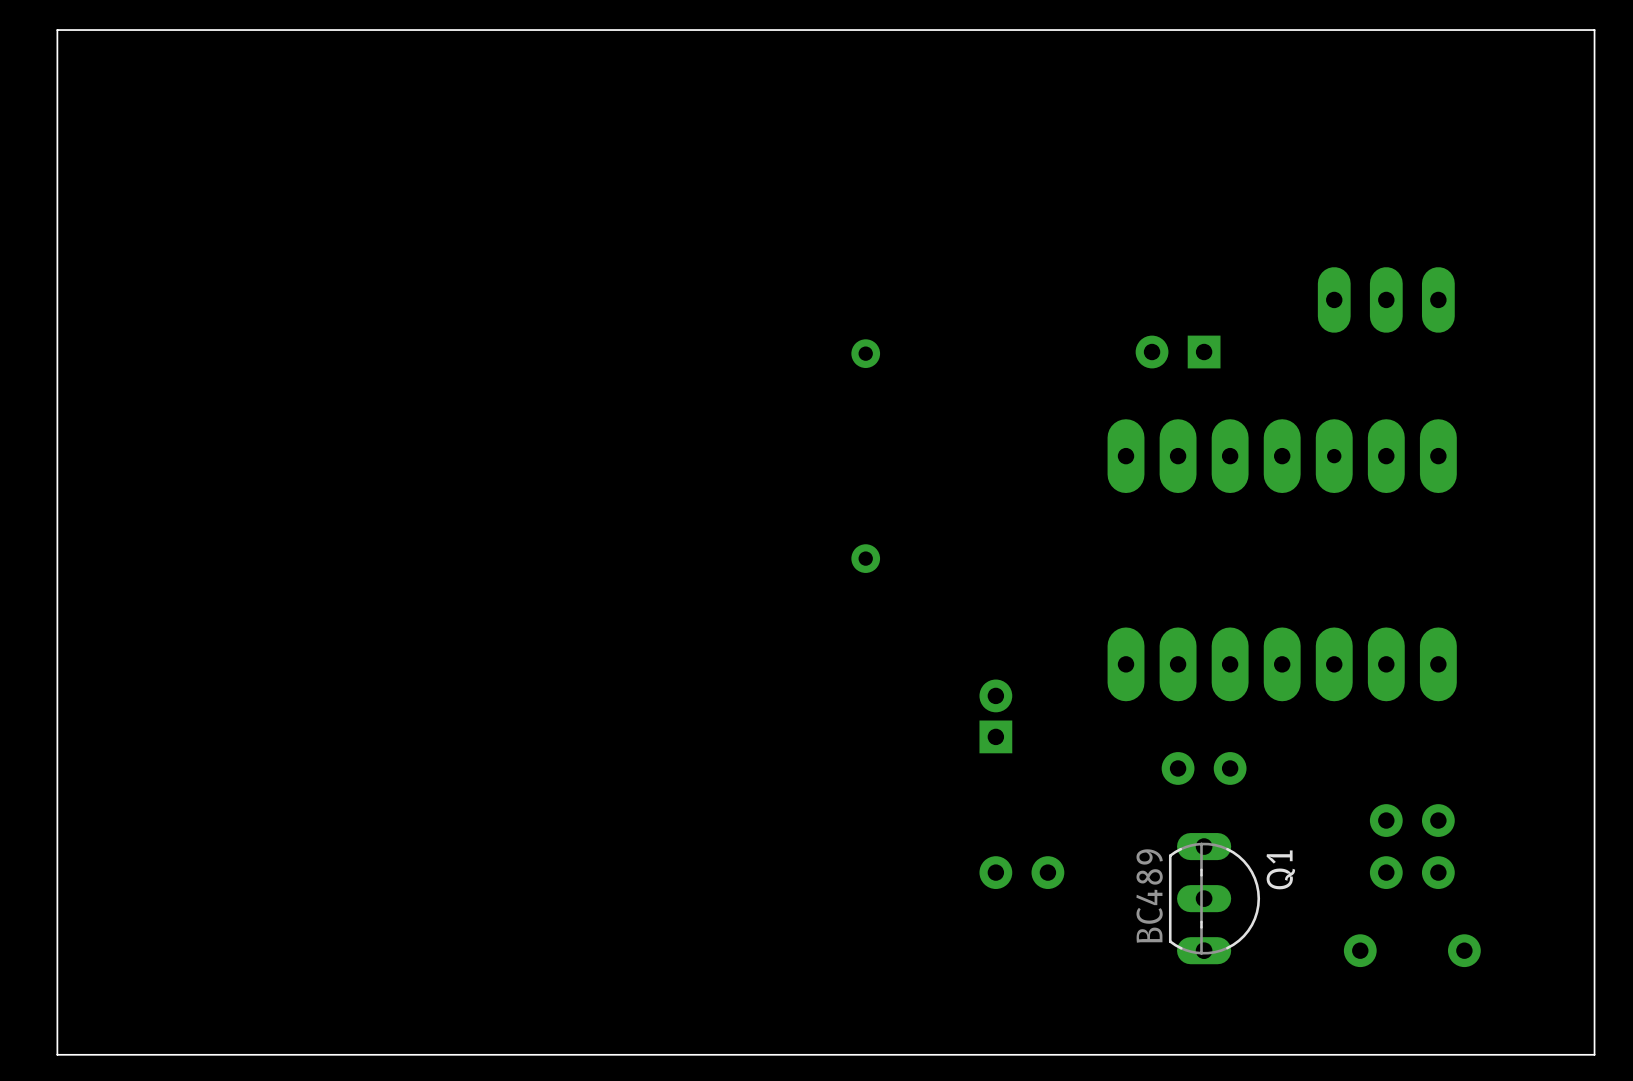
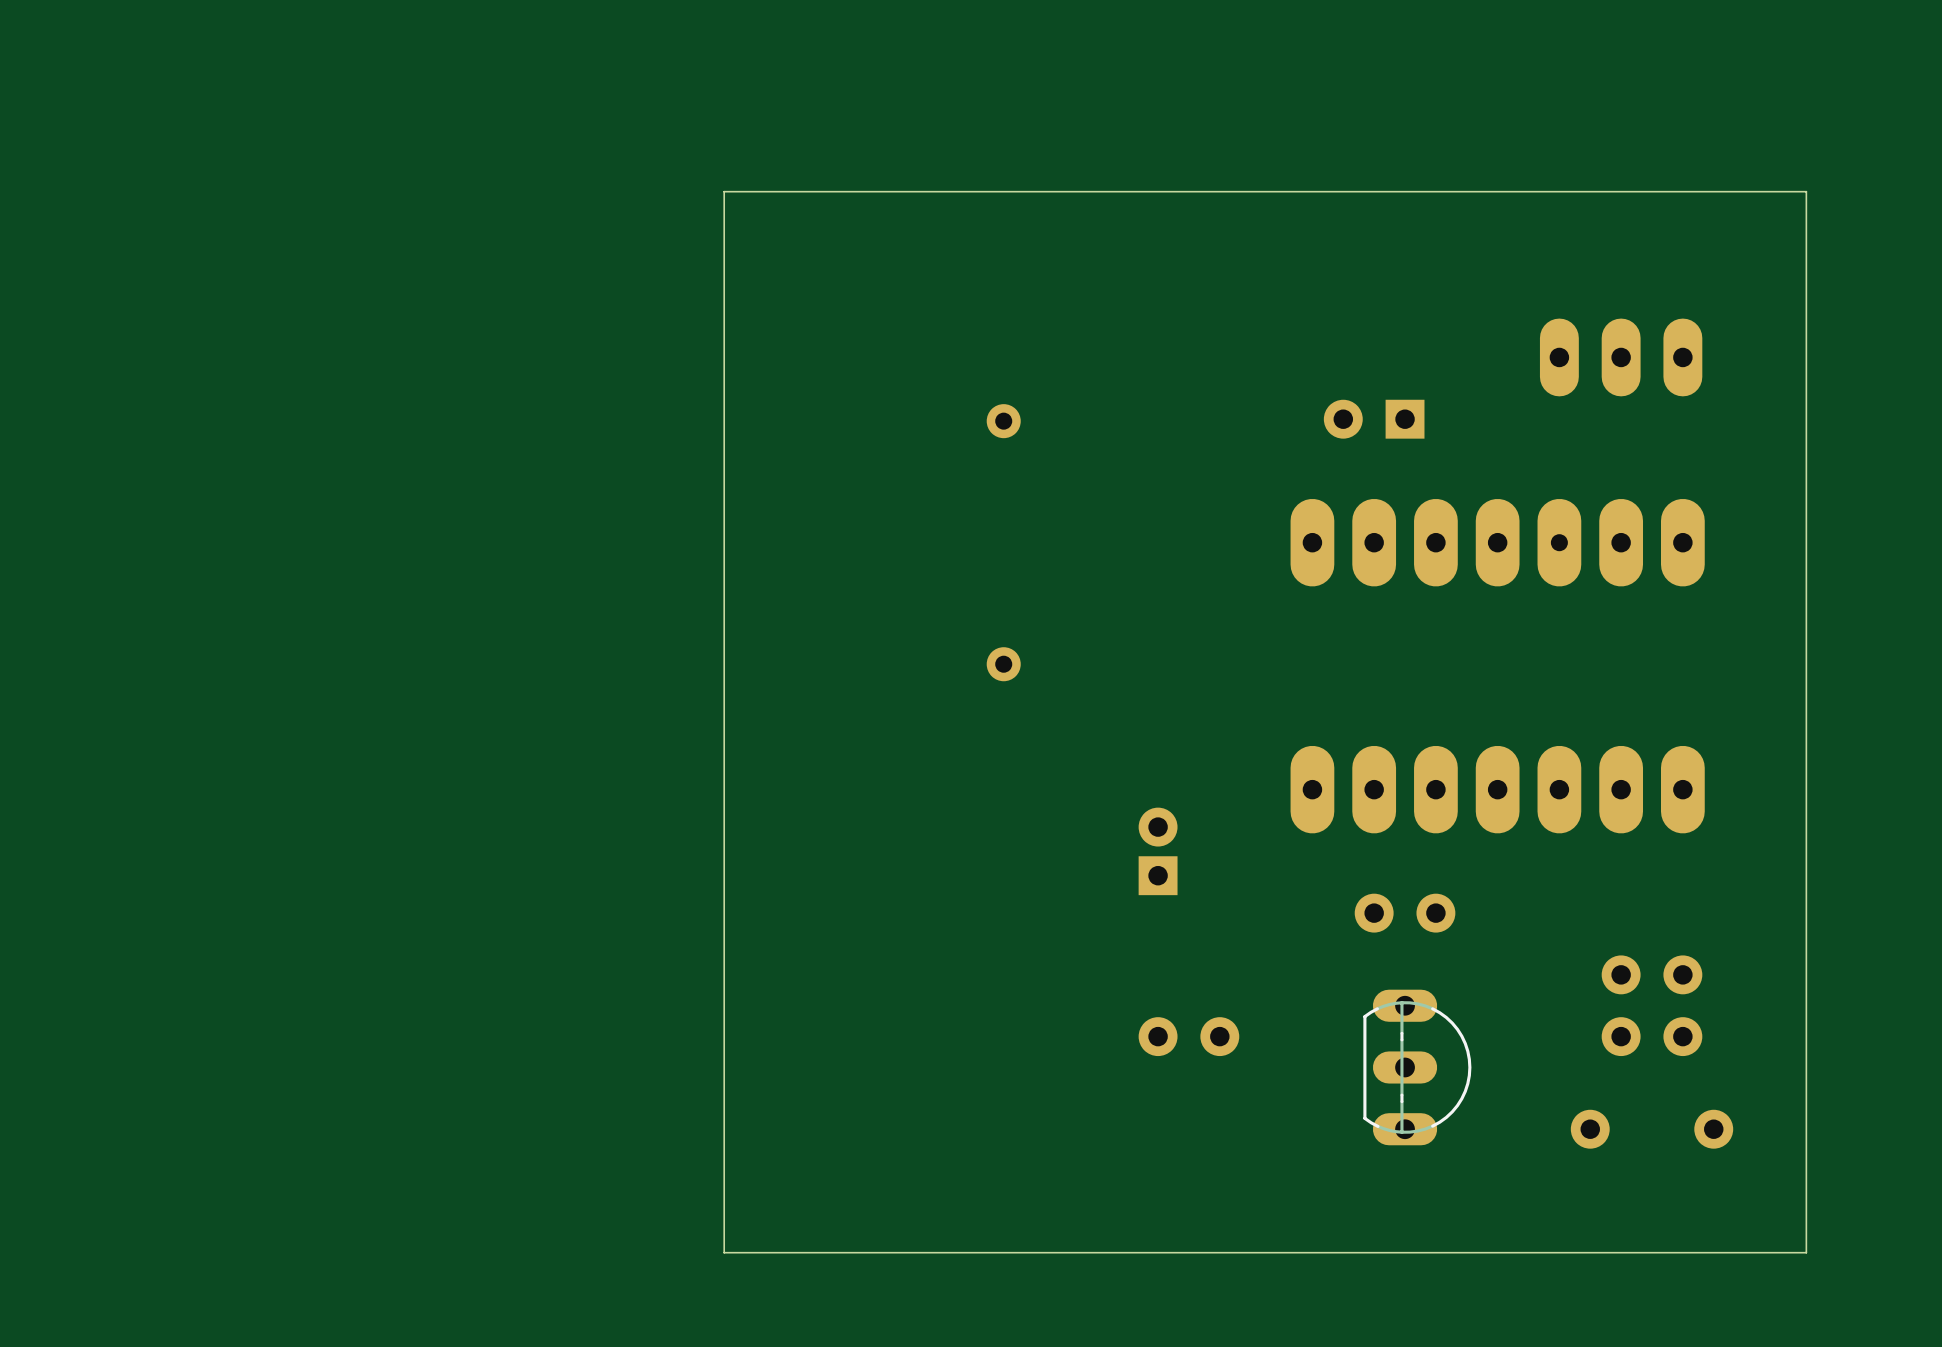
Q1 name: Q1 (1280, 869) -> none
Q1 value: BC489 (1149, 896) -> none
board edge: (1542, 1054) (1594, 1054) (1594, 30) (57, 30) (57, 1054) (630, 1054) -> (1806, 1252) (1806, 191) (724, 191) (724, 1252)

